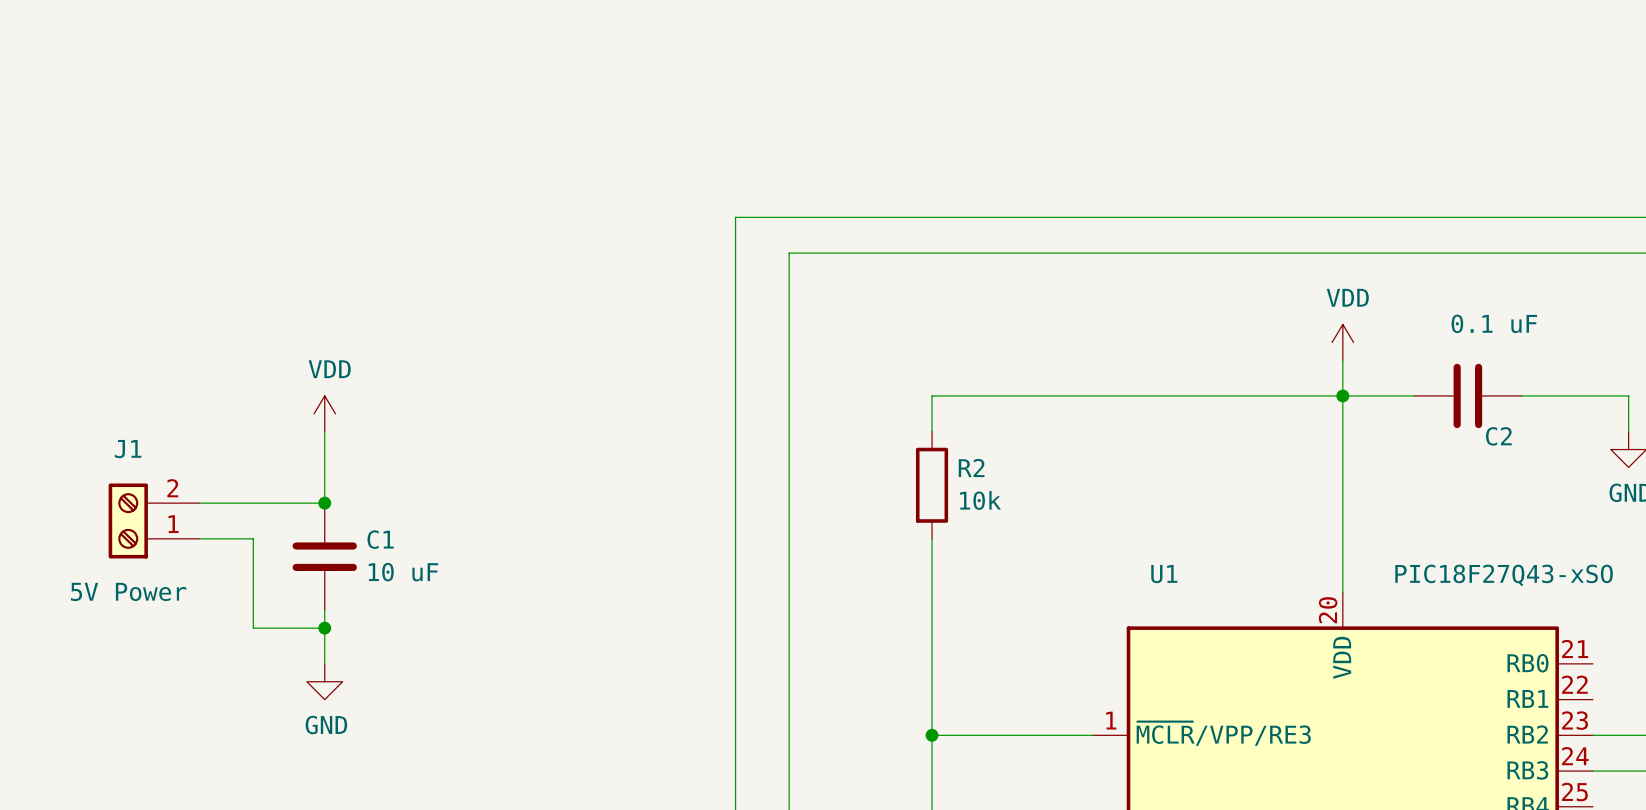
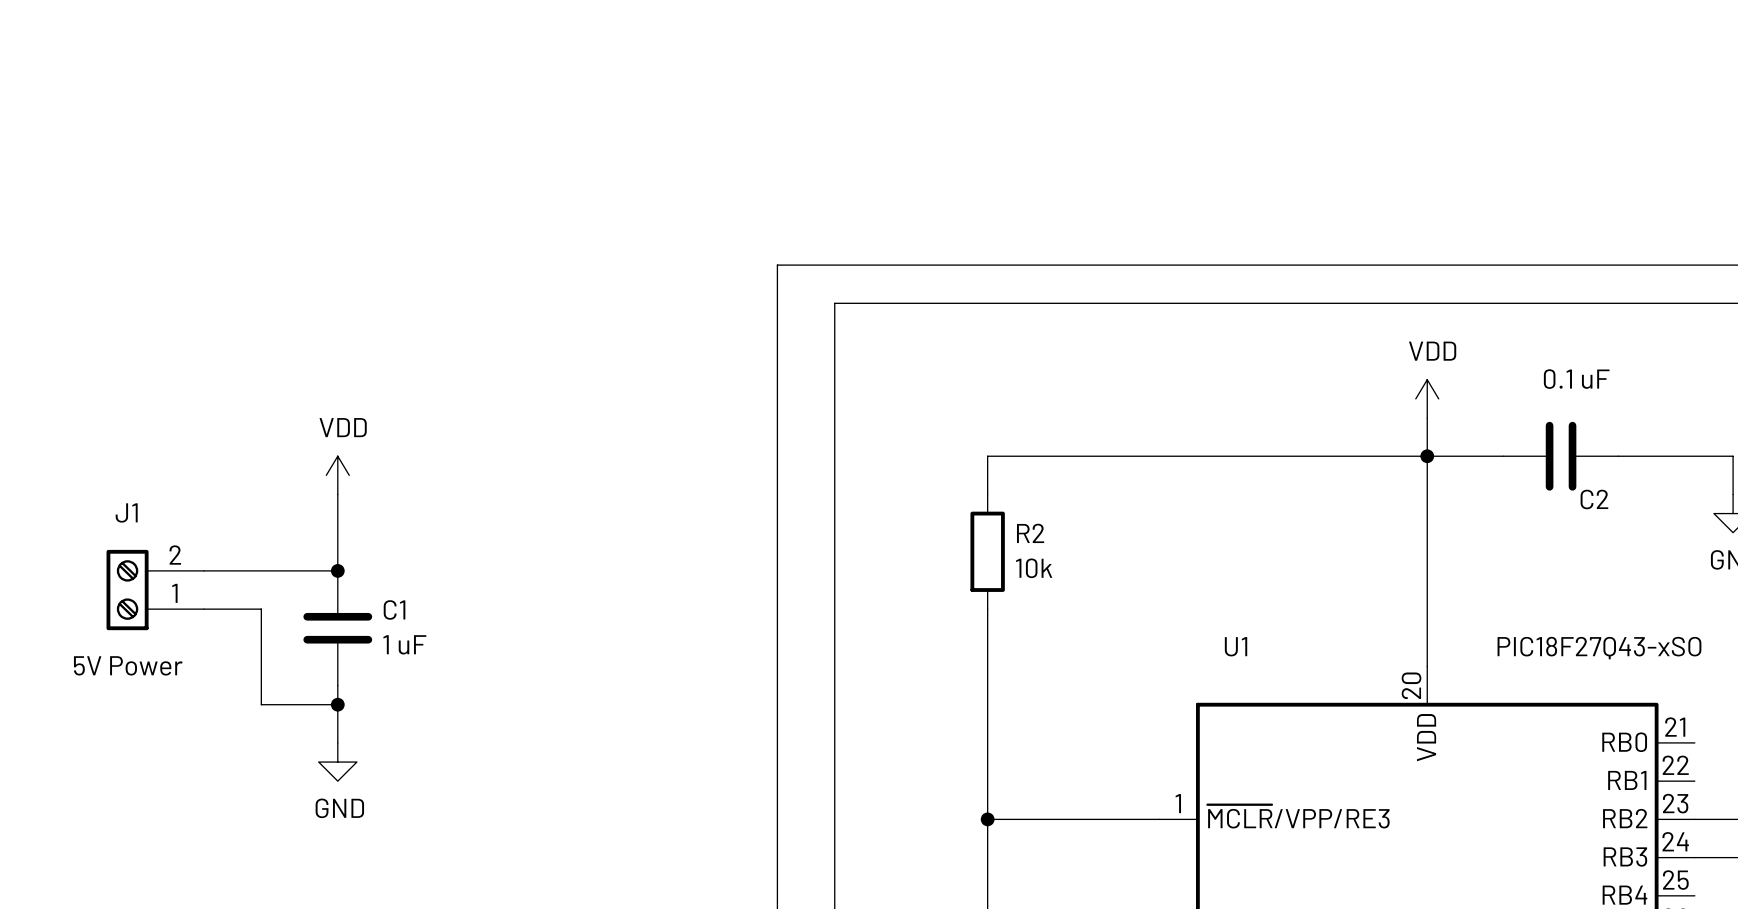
C1 value: 10 uF (403, 572) -> 1 uF (404, 644)

